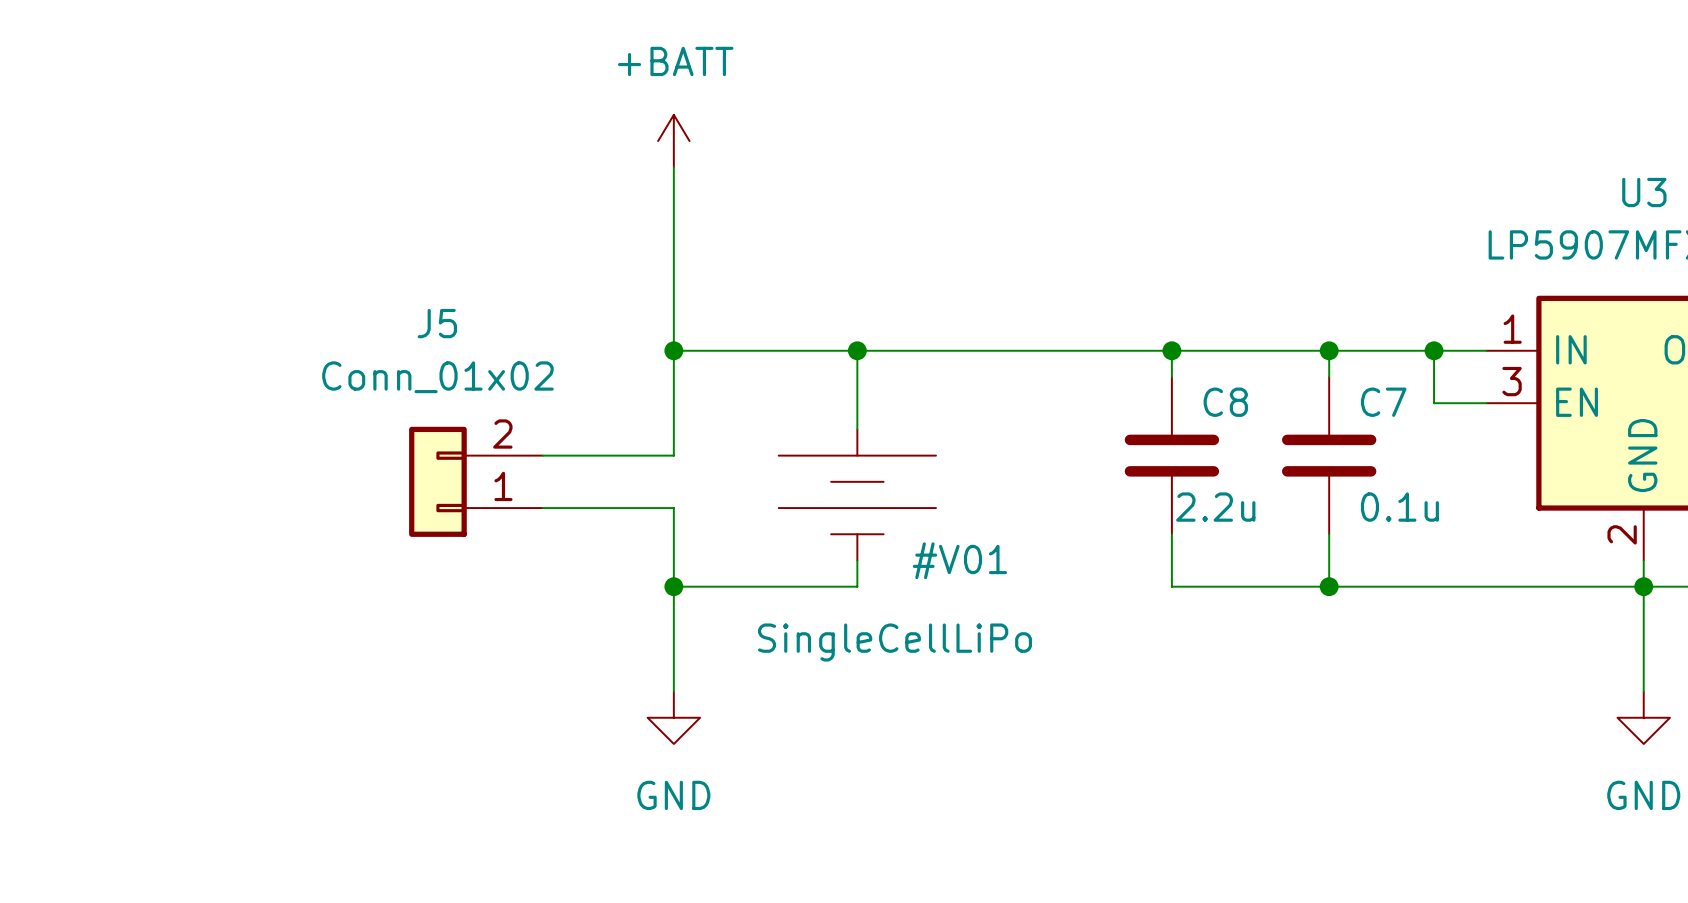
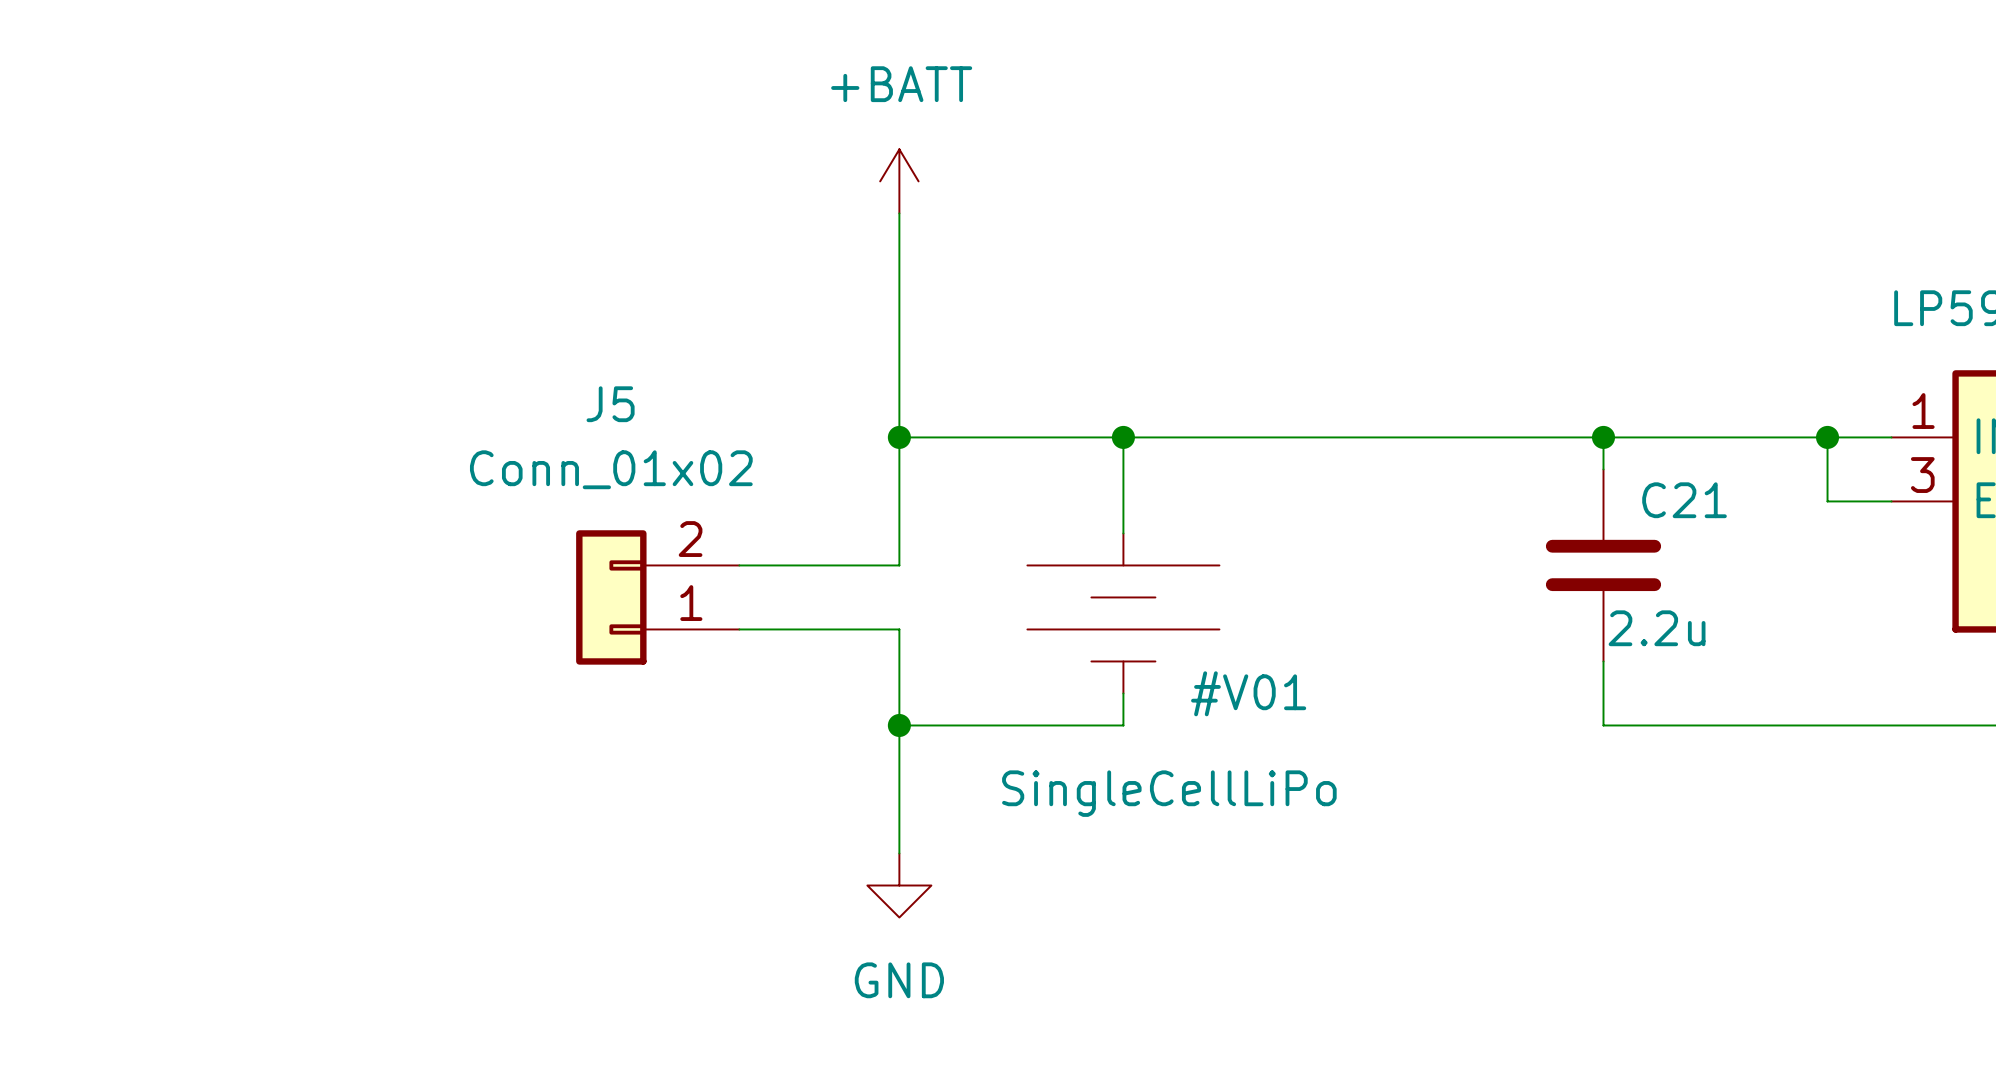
wire: (1171, 350) (1171, 376) -> (1603, 437) (1603, 469)
junction: (1171, 350) -> none
junction: none -> (1603, 437)
wire: (1329, 350) (1329, 376) -> none
junction: (1329, 350) -> none
C8: 2.2u (1171, 455) -> none
C21: none -> 2.2u (1603, 565)
C7: 0.1u (1329, 455) -> none
wire: (1171, 534) (1171, 586) (1250, 586) -> (1603, 661) (1603, 725)
wire: (1329, 534) (1329, 586) -> none
junction: (1329, 586) -> none

